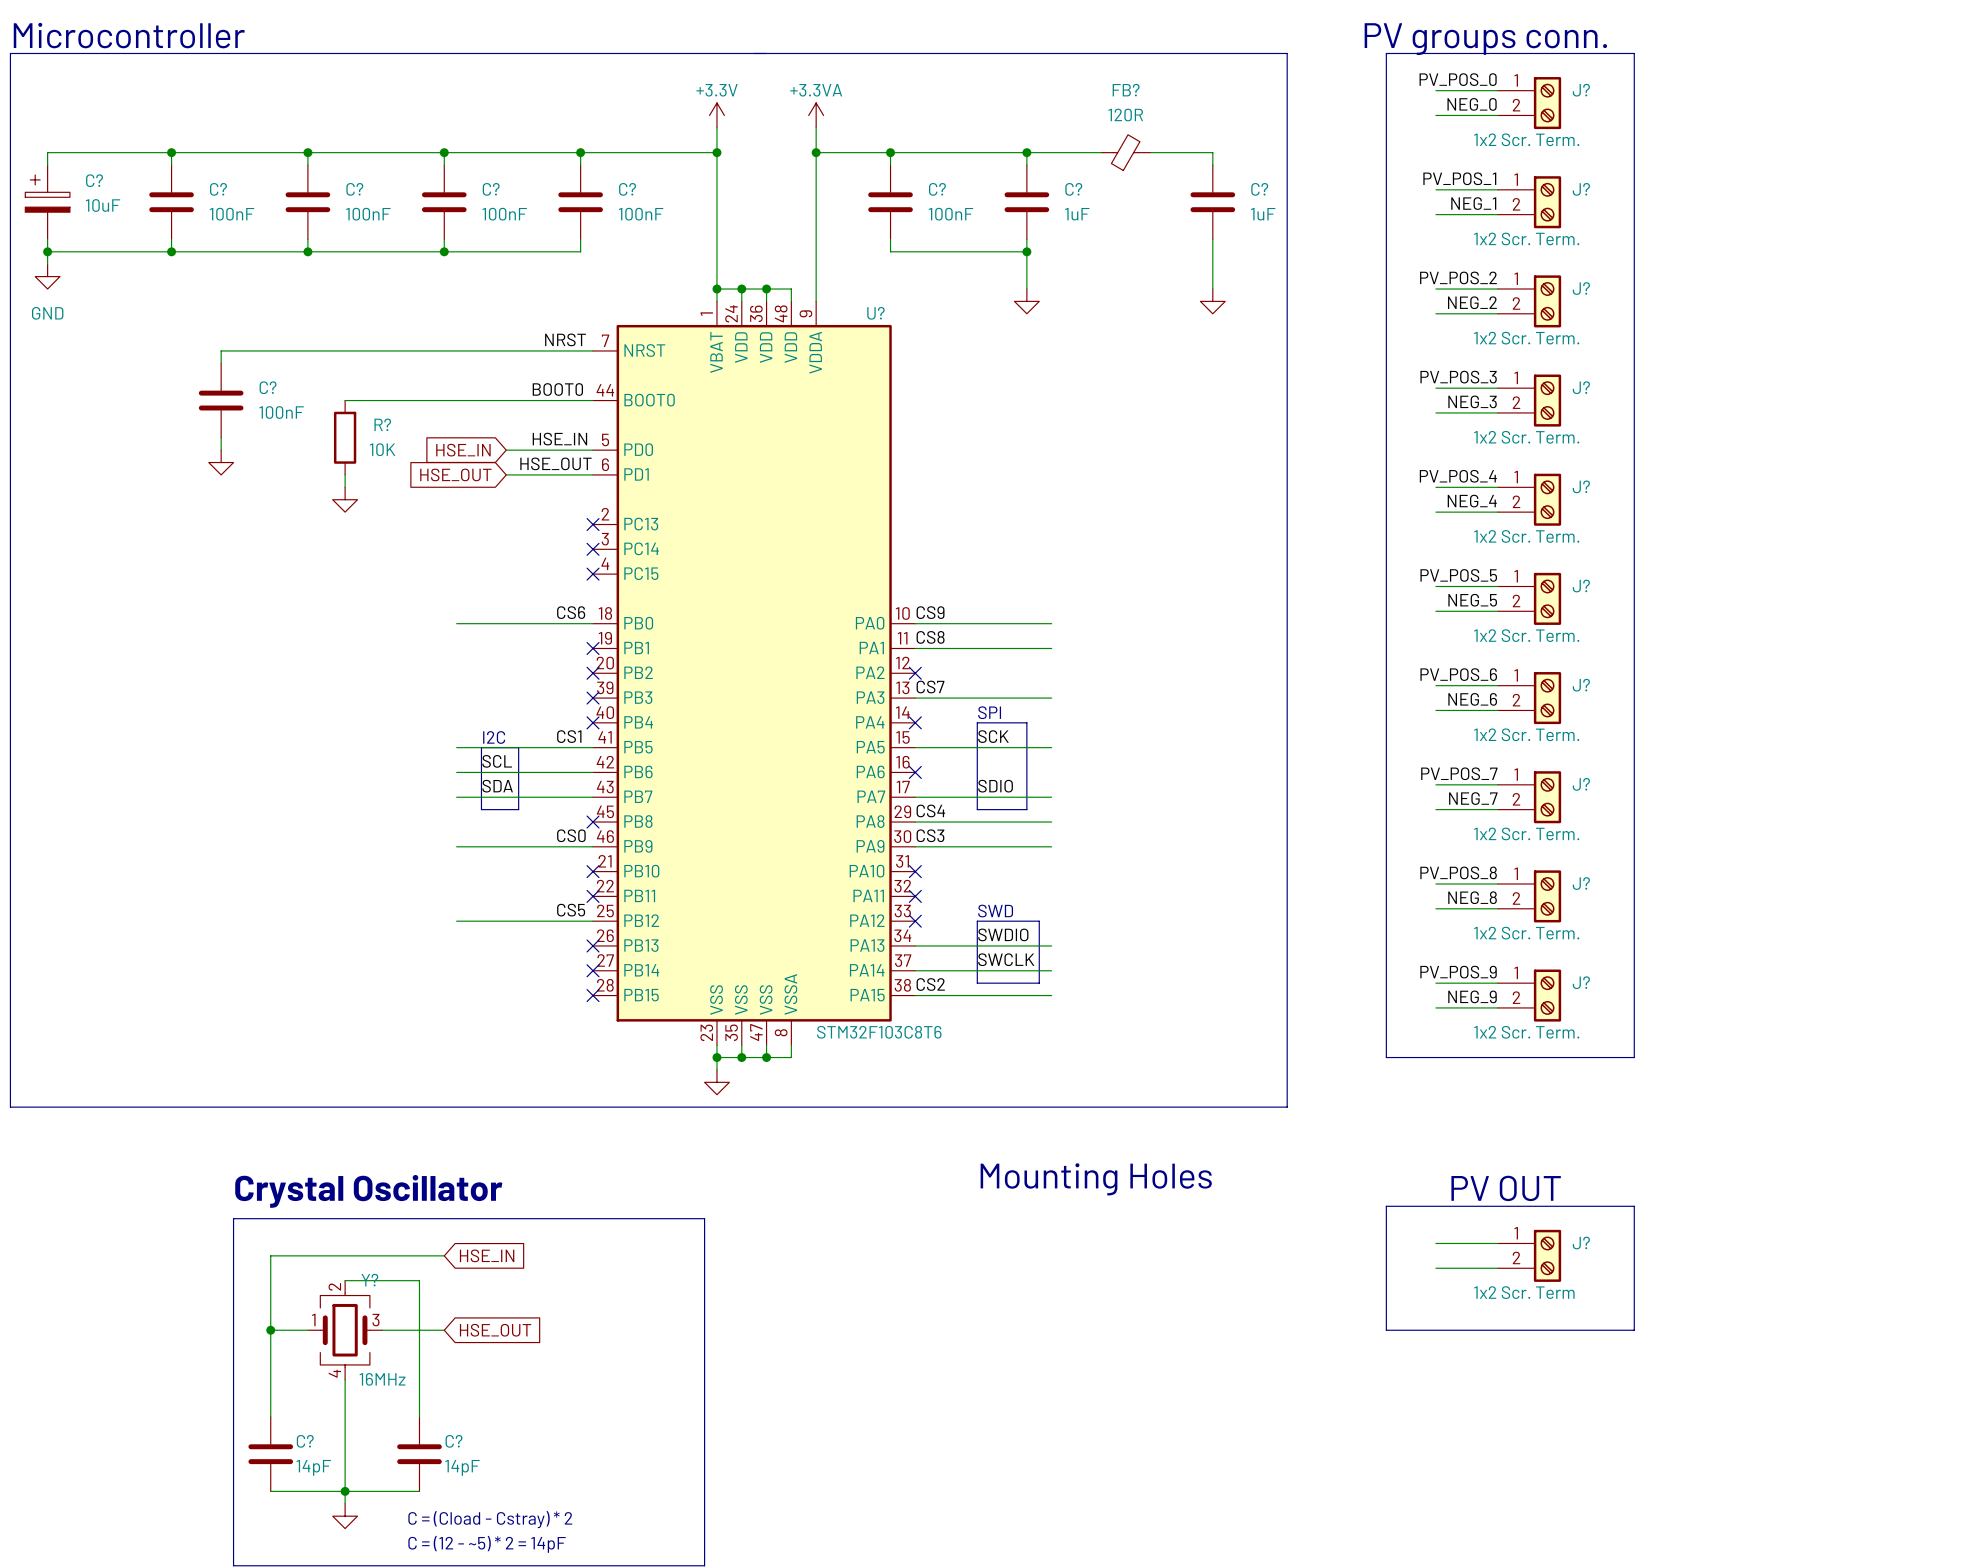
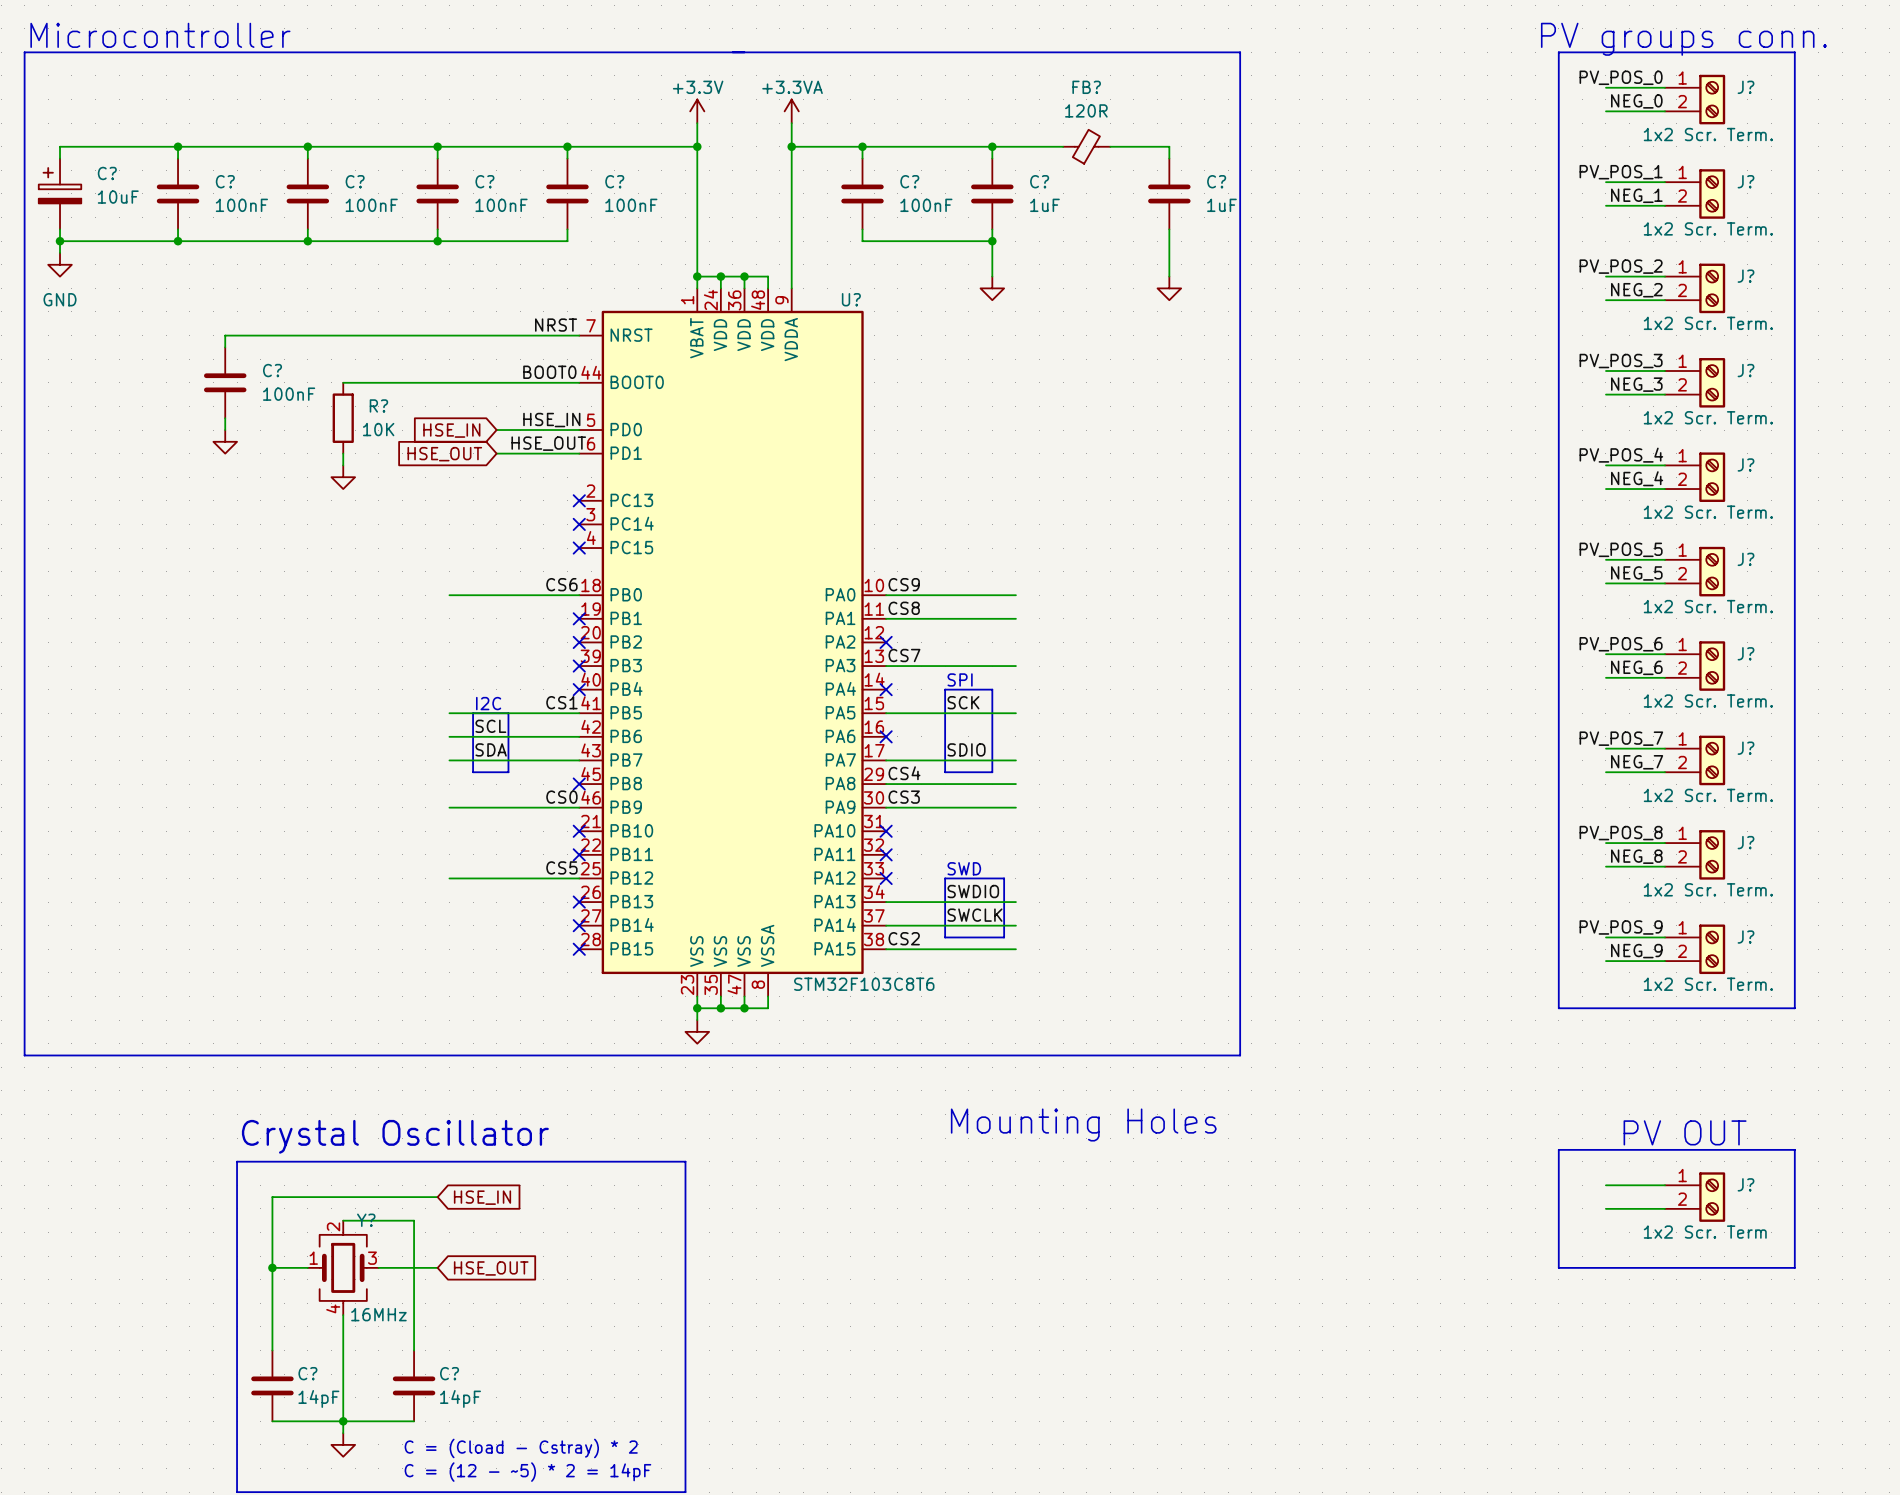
text position: PV groups conn. (1485, 39) -> PV groups conn. (1683, 39)
line: (1621, 53) (1386, 53) (1386, 1057) (1621, 1057) -> (1558, 52) (1558, 1008)
line: (1634, 53) (1634, 1057) -> (1570, 52) (1794, 52) (1794, 1008) (1570, 1008)
label position: PV_POS_0 (1458, 79) -> PV_POS_0 (1621, 77)
wire: (1435, 90) (1497, 90) -> (1605, 87) (1665, 87)
J?: 1x2 Scr. Term. (1529, 103) -> none
J?: none -> 1x2 Scr. Term. (1695, 99)
label position: NEG_0 (1472, 104) -> NEG_0 (1636, 101)
wire: (1435, 115) (1497, 115) -> (1605, 111) (1665, 111)
label position: PV_POS_1 (1459, 178) -> PV_POS_1 (1621, 172)
wire: (1435, 189) (1497, 189) -> (1605, 182) (1665, 182)
J?: 1x2 Scr. Term. (1529, 202) -> none
J?: none -> 1x2 Scr. Term. (1695, 193)
label position: NEG_1 (1473, 203) -> NEG_1 (1636, 195)
wire: (1435, 214) (1497, 214) -> (1605, 205) (1665, 205)
label position: PV_POS_2 (1458, 277) -> PV_POS_2 (1621, 266)
wire: (1435, 289) (1497, 289) -> (1605, 276) (1665, 276)
J?: 1x2 Scr. Term. (1529, 301) -> none
J?: none -> 1x2 Scr. Term. (1695, 288)
label position: NEG_2 (1472, 302) -> NEG_2 (1636, 290)
wire: (1435, 313) (1497, 313) -> (1605, 300) (1665, 300)
label position: PV_POS_3 (1458, 377) -> PV_POS_3 (1621, 361)
wire: (1435, 388) (1497, 388) -> (1605, 370) (1665, 370)
J?: 1x2 Scr. Term. (1529, 400) -> none
J?: none -> 1x2 Scr. Term. (1695, 382)
label position: NEG_3 (1472, 401) -> NEG_3 (1636, 384)
wire: (1435, 412) (1497, 412) -> (1605, 394) (1665, 394)
label position: PV_POS_4 (1458, 476) -> PV_POS_4 (1621, 455)
wire: (1435, 487) (1497, 487) -> (1605, 465) (1665, 465)
J?: 1x2 Scr. Term. (1529, 499) -> none
J?: none -> 1x2 Scr. Term. (1695, 477)
label position: NEG_4 (1472, 501) -> NEG_4 (1637, 478)
wire: (1435, 512) (1497, 512) -> (1605, 489) (1665, 489)
label position: PV_POS_5 (1458, 575) -> PV_POS_5 (1621, 549)
wire: (1435, 586) (1497, 586) -> (1605, 559) (1665, 559)
J?: 1x2 Scr. Term. (1529, 598) -> none
J?: none -> 1x2 Scr. Term. (1695, 571)
label position: NEG_5 (1472, 600) -> NEG_5 (1636, 573)
wire: (1435, 611) (1497, 611) -> (1605, 583) (1665, 583)
label position: PV_POS_6 (1458, 674) -> PV_POS_6 (1621, 644)
wire: (1435, 685) (1497, 685) -> (1605, 654) (1665, 654)
J?: 1x2 Scr. Term. (1529, 698) -> none
J?: none -> 1x2 Scr. Term. (1695, 666)
label position: NEG_6 (1472, 699) -> NEG_6 (1636, 667)
wire: (1435, 710) (1497, 710) -> (1605, 677) (1665, 677)
label position: PV_POS_7 (1459, 773) -> PV_POS_7 (1621, 738)
wire: (1435, 784) (1497, 784) -> (1605, 748) (1665, 748)
J?: 1x2 Scr. Term. (1529, 797) -> none
J?: none -> 1x2 Scr. Term. (1695, 760)
label position: NEG_7 (1473, 798) -> NEG_7 (1637, 762)
wire: (1435, 809) (1497, 809) -> (1605, 772) (1665, 772)
label position: PV_POS_8 (1458, 872) -> PV_POS_8 (1621, 833)
wire: (1435, 884) (1497, 884) -> (1605, 843) (1665, 843)
J?: 1x2 Scr. Term. (1529, 896) -> none
J?: none -> 1x2 Scr. Term. (1695, 854)
label position: NEG_8 (1472, 897) -> NEG_8 (1636, 856)
wire: (1435, 908) (1497, 908) -> (1605, 866) (1665, 866)
label position: PV_POS_9 (1458, 972) -> PV_POS_9 (1621, 927)
wire: (1435, 983) (1497, 983) -> (1605, 937) (1665, 937)
J?: 1x2 Scr. Term. (1529, 995) -> none
J?: none -> 1x2 Scr. Term. (1695, 949)
label position: NEG_9 (1472, 996) -> NEG_9 (1636, 951)
wire: (1435, 1007) (1497, 1007) -> (1605, 961) (1665, 961)
text position: PV OUT (1506, 1188) -> PV OUT (1685, 1132)
line: (1621, 1206) (1386, 1206) (1386, 1330) (1621, 1330) -> (1558, 1149) (1558, 1267)
line: (1634, 1206) (1634, 1330) -> (1570, 1149) (1794, 1149) (1794, 1267) (1570, 1267)
wire: (1435, 1243) (1497, 1243) -> (1605, 1185) (1665, 1185)
J? position: (1529, 1255) -> (1695, 1197)
wire: (1435, 1268) (1497, 1268) -> (1605, 1208) (1665, 1208)

